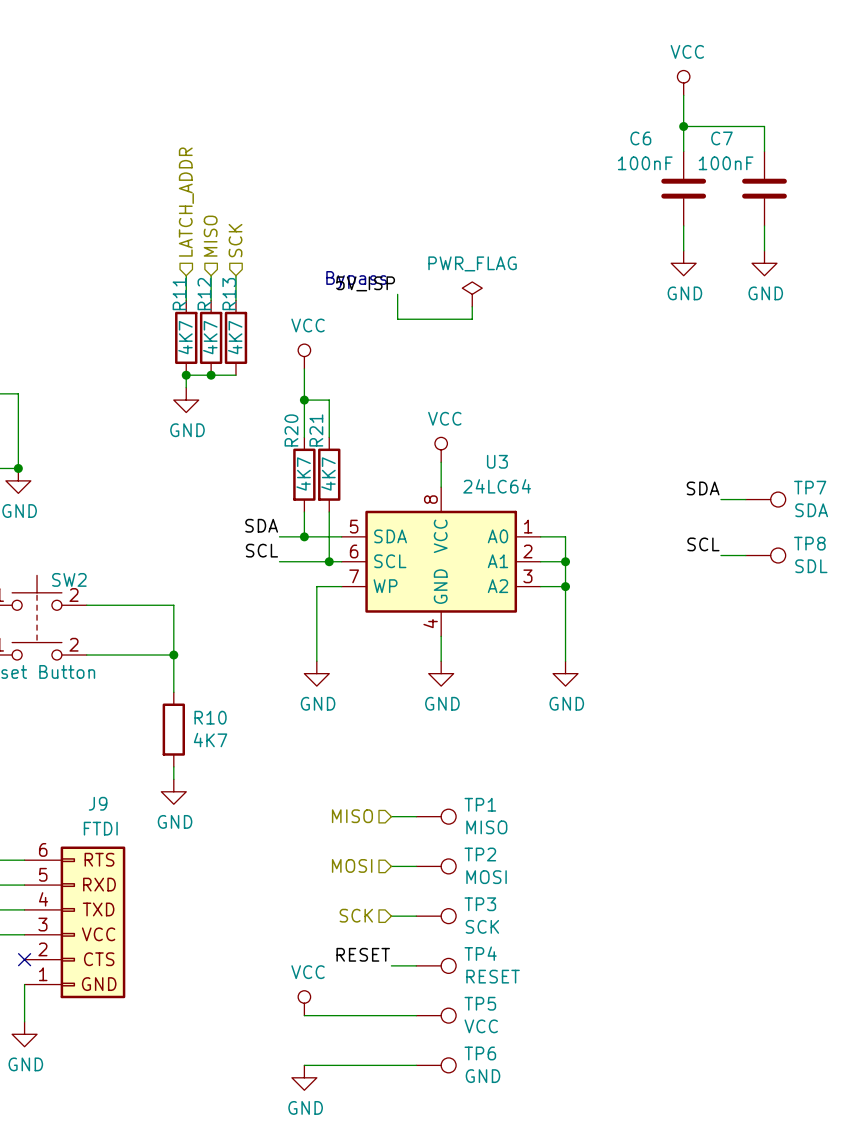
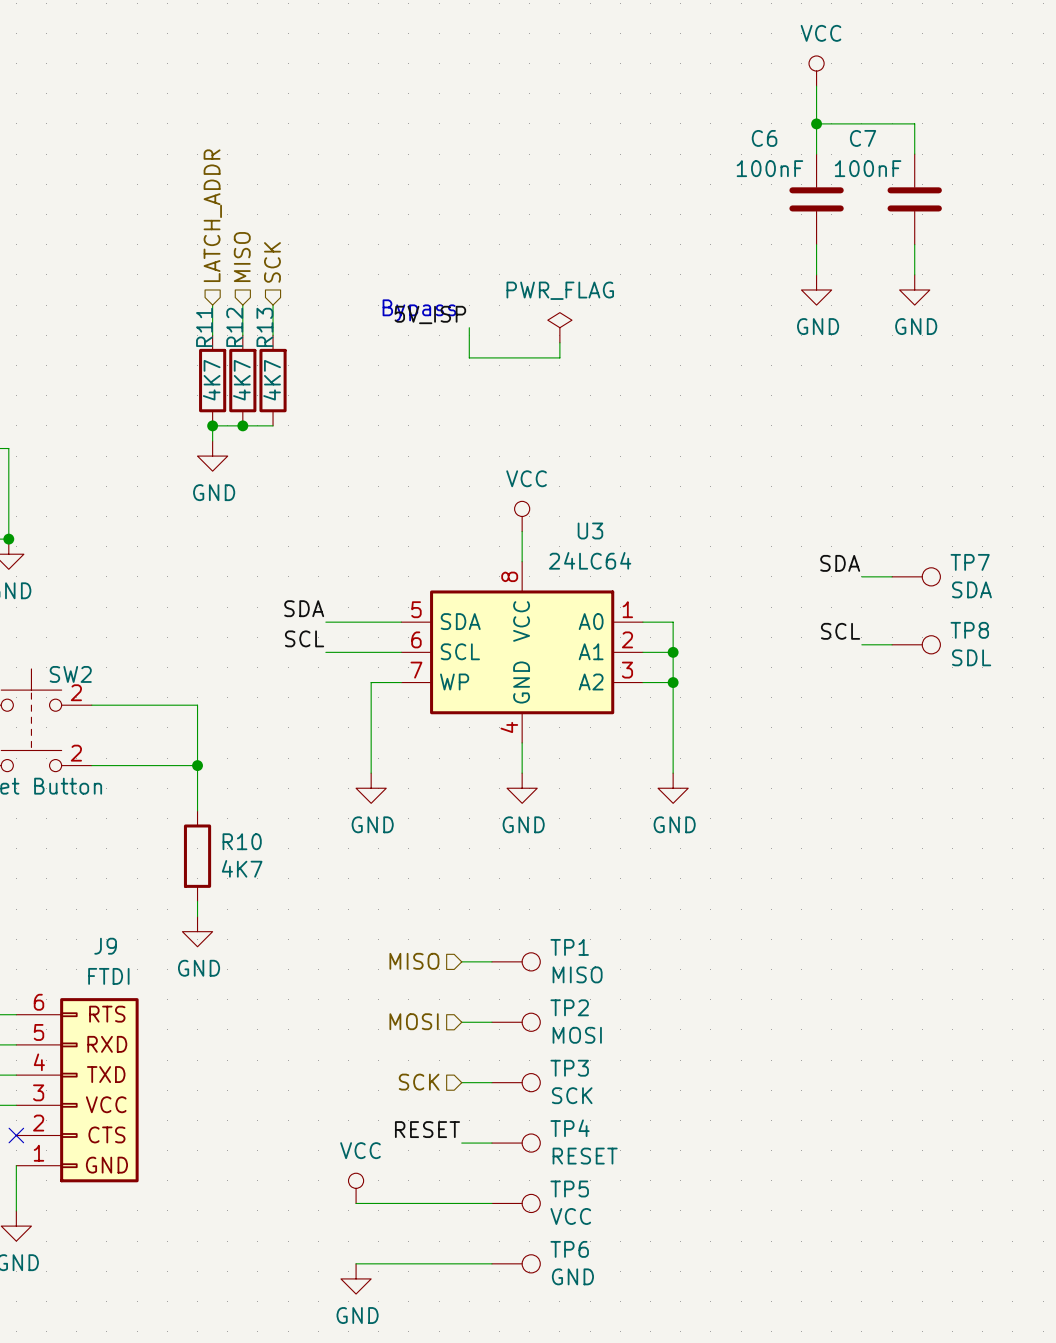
power symbol: VCC (304, 356) -> none
wire: (304, 368) (304, 437) -> none
wire: (304, 400) (329, 400) (329, 437) -> none
junction: (304, 400) -> none
R20: 4K7 (304, 474) -> none
R21: 4K7 (329, 474) -> none
wire: (304, 511) (304, 536) -> none
wire: (329, 511) (329, 561) -> none
junction: (304, 536) -> none
junction: (329, 561) -> none

